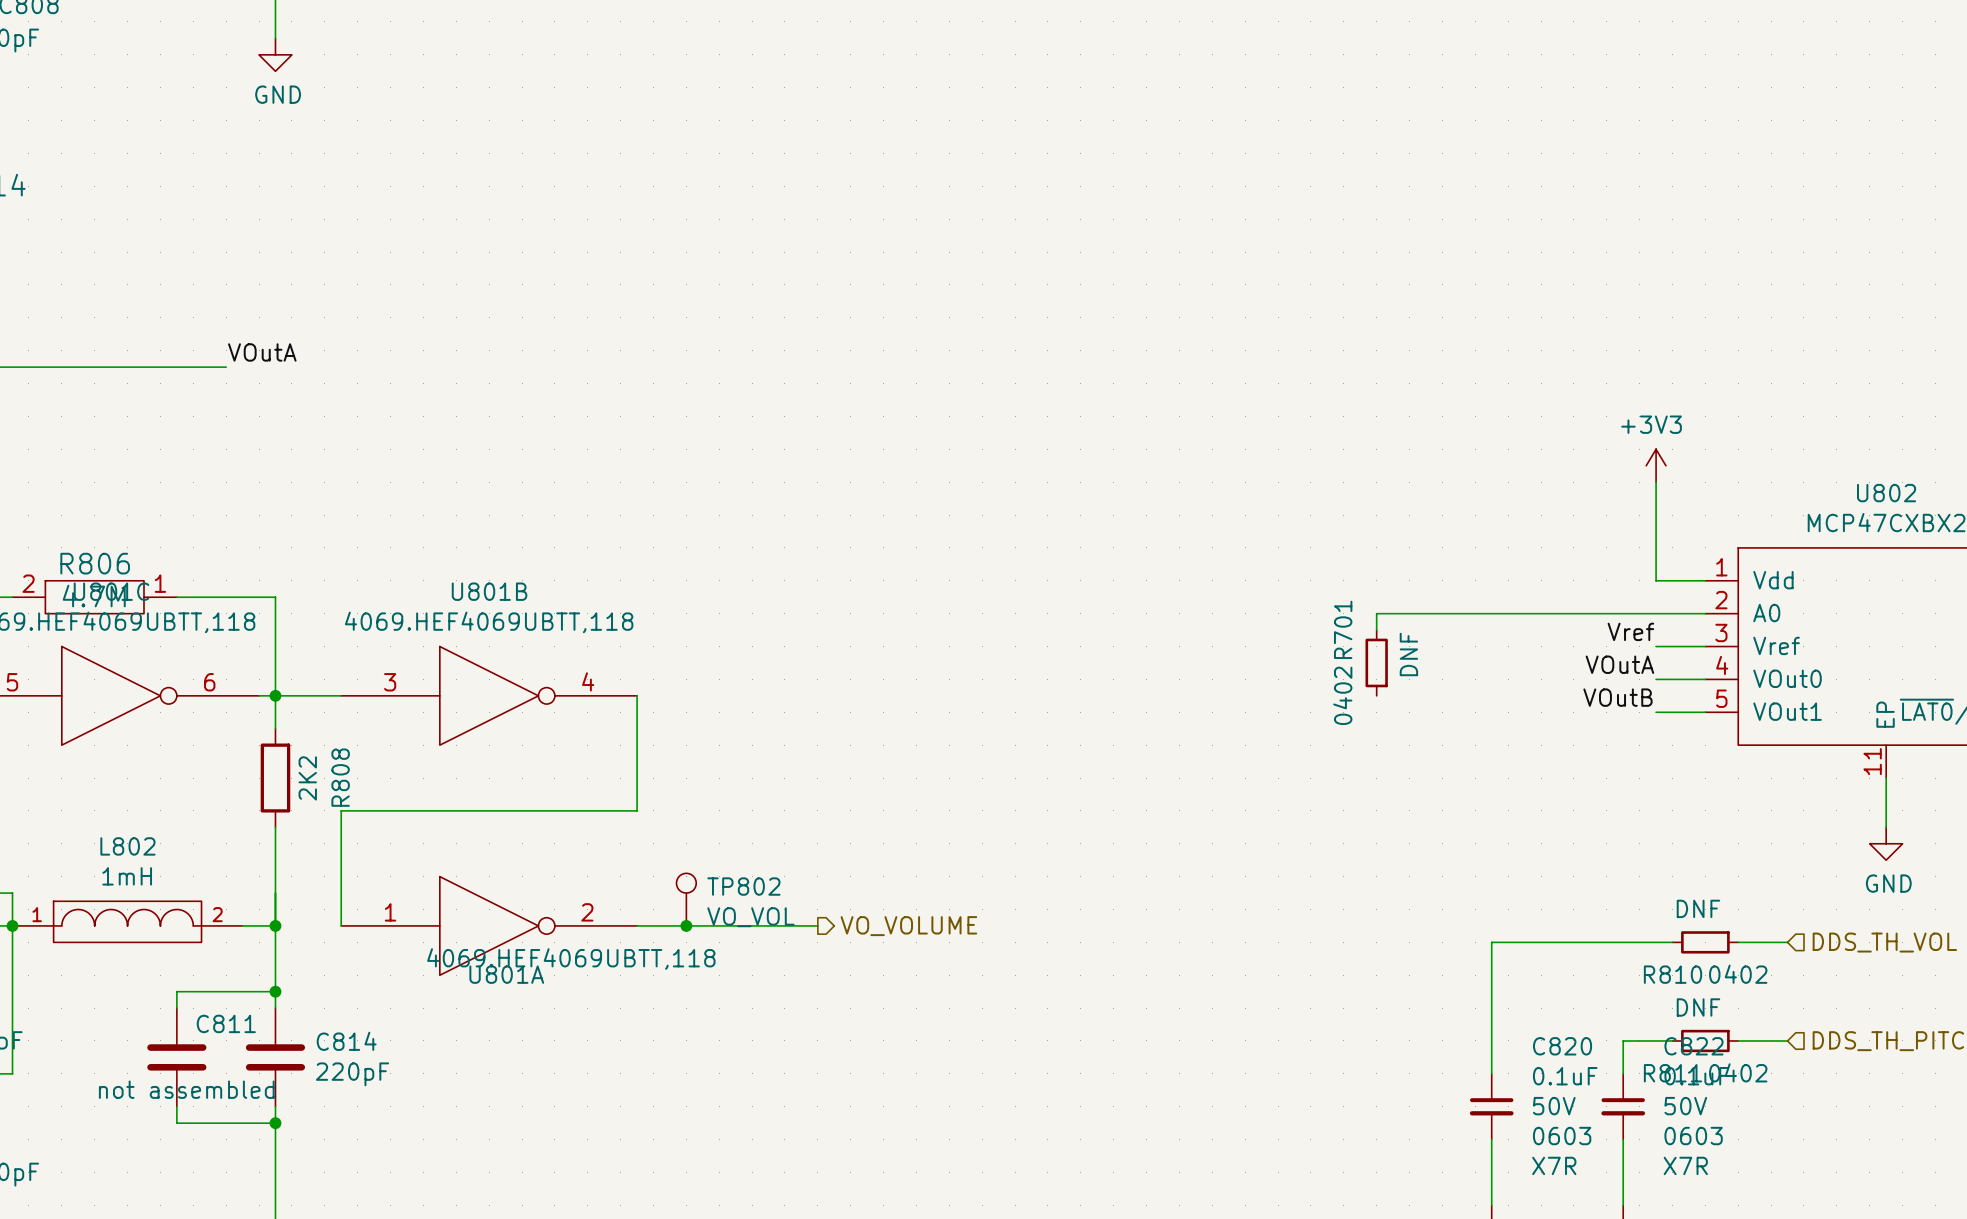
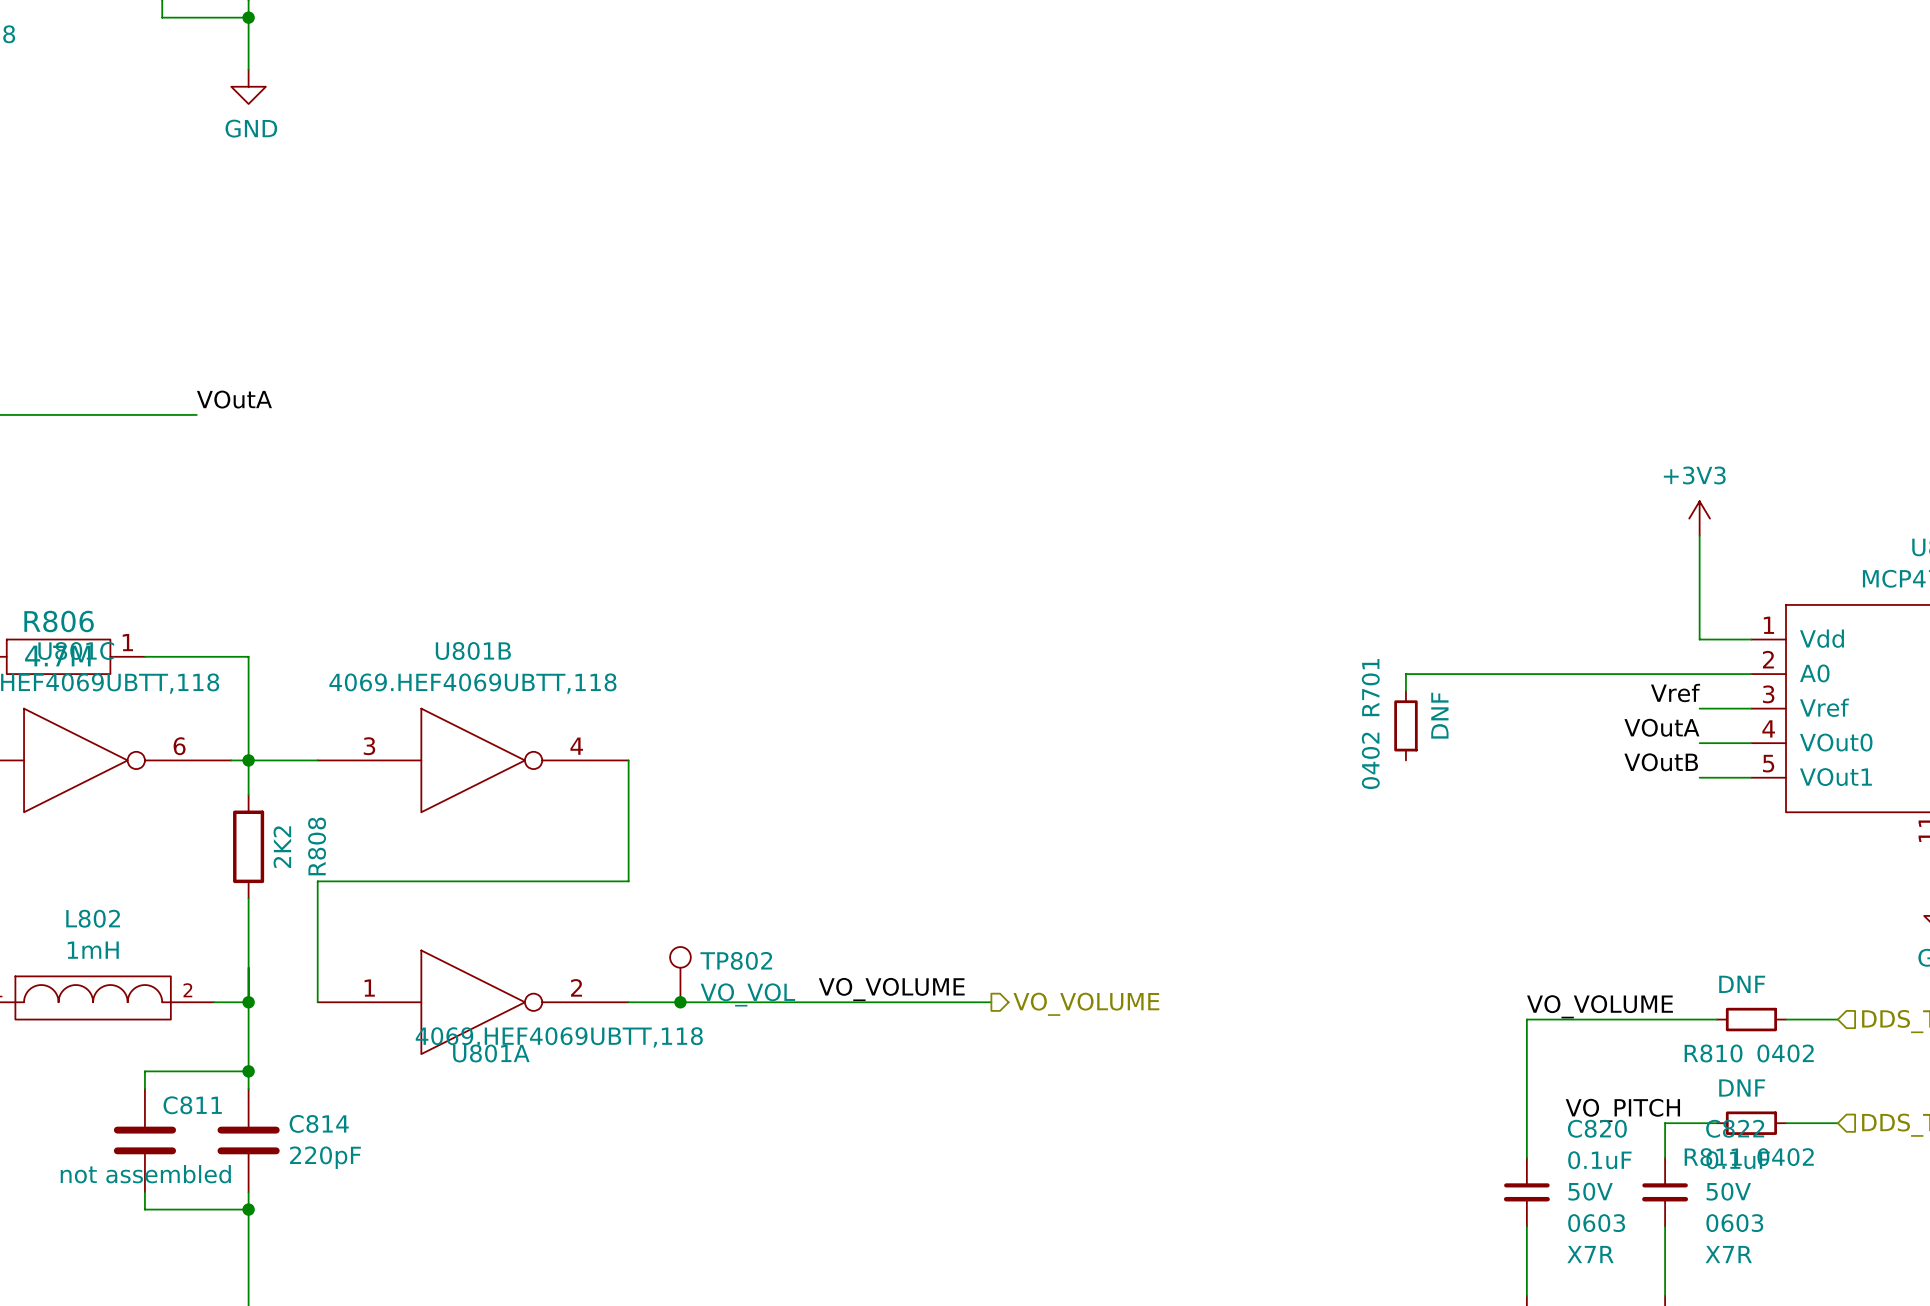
label: none -> VO_VOLUME (891, 989)
wire: none -> (818, 1002) (991, 1002)
hierarchical label position: VO_VOLUME (908, 926) -> VO_VOLUME (1086, 1004)
label: none -> VO_VOLUME (1599, 1006)
label: none -> VO_PITCH (1622, 1110)

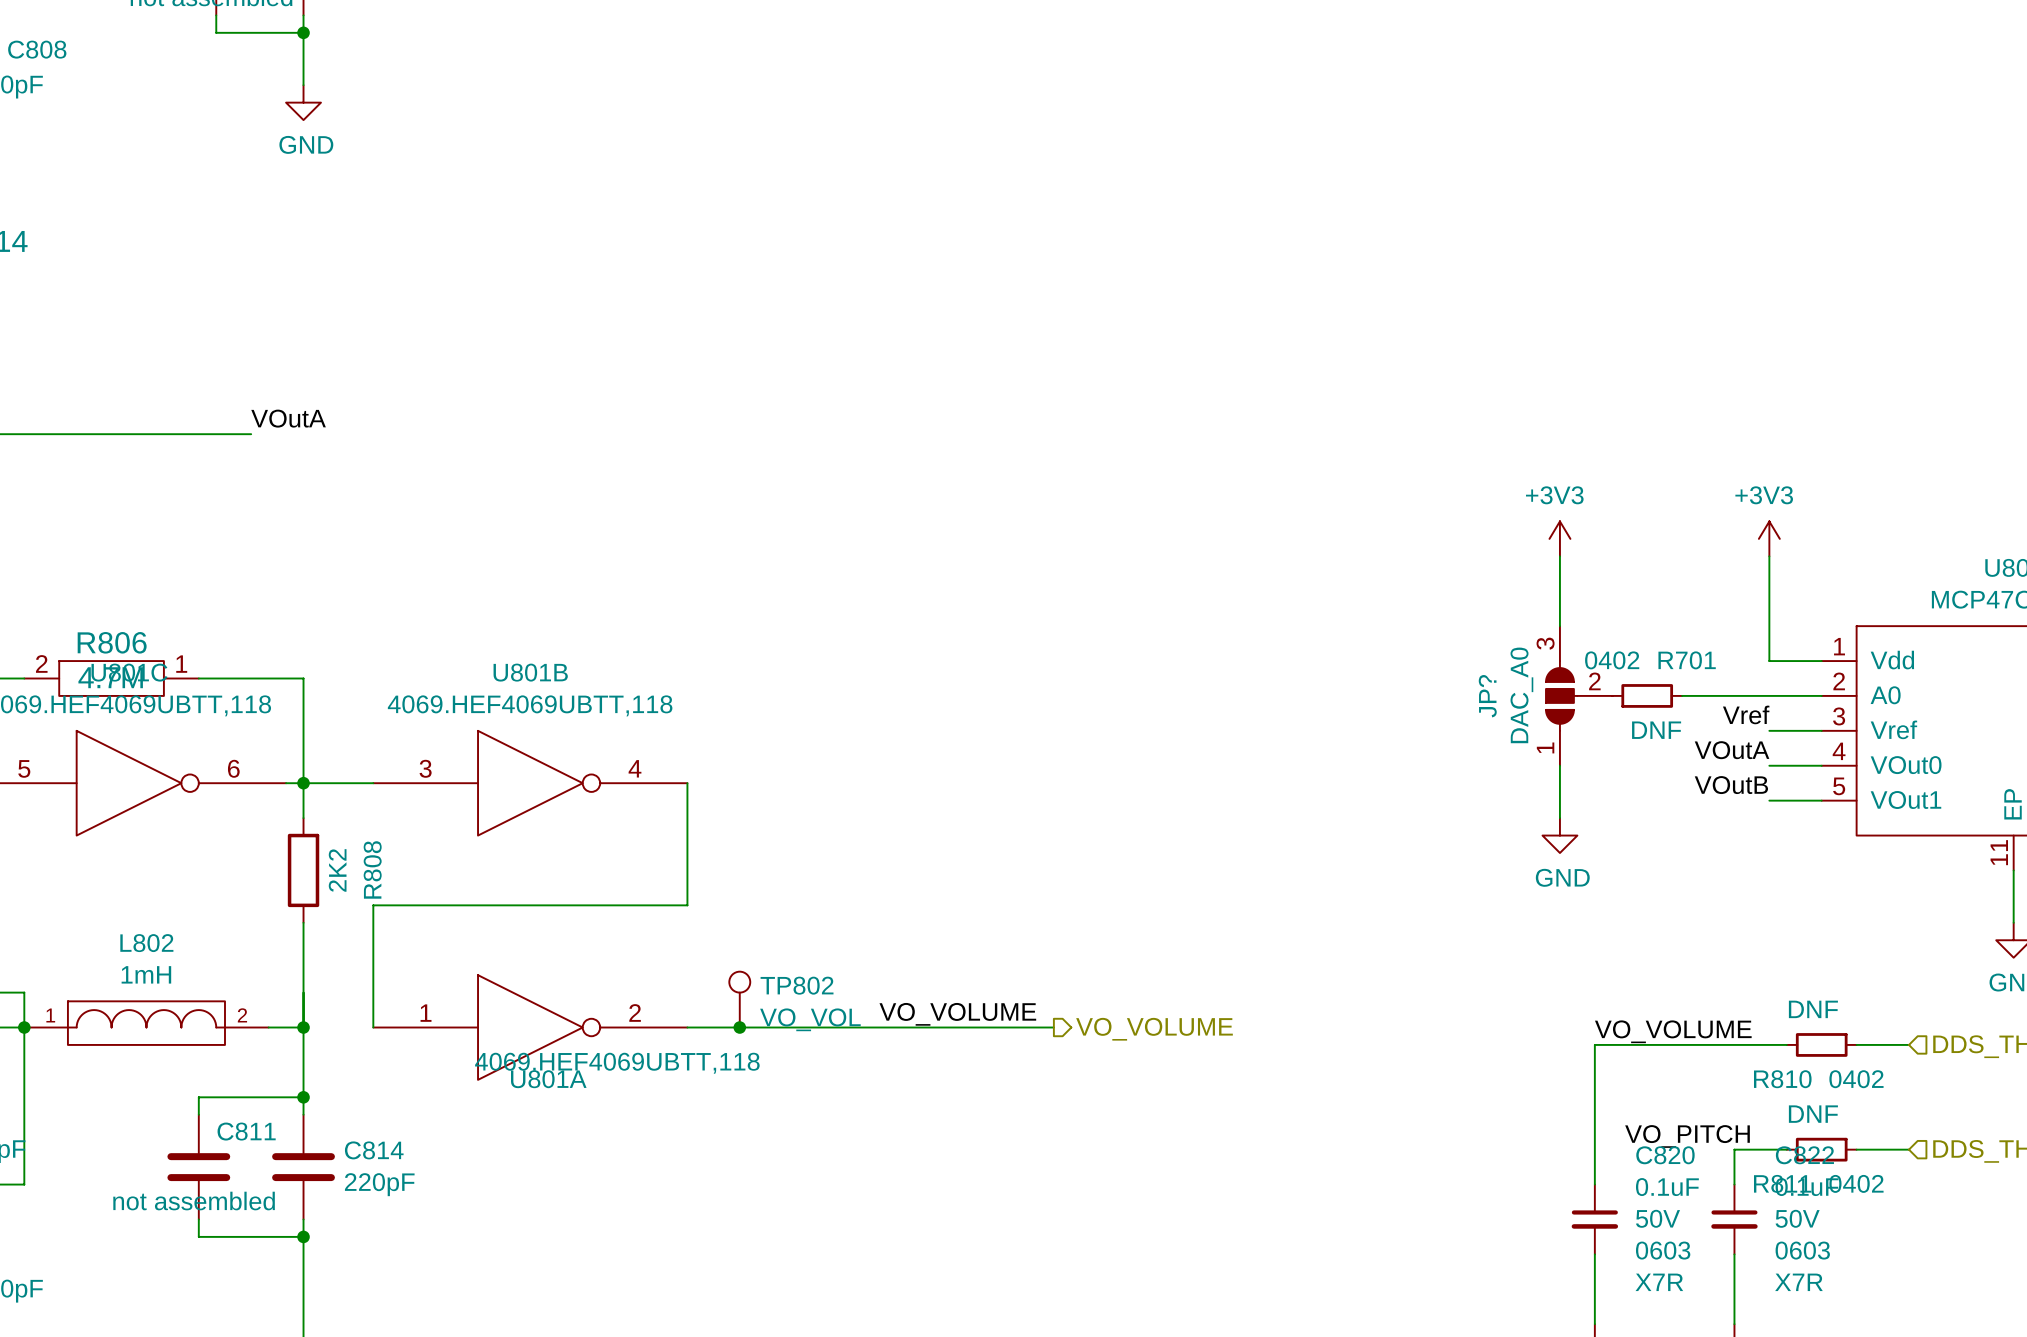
power symbol: none -> +3V3 (1559, 538)
wire: none -> (1559, 556) (1559, 626)
JP?: none -> DAC_A0 (1579, 695)
wire: (1613, 674) (1405, 674) (1405, 691) -> none
R701 rotation: 0° (1405, 725) -> 90° clockwise (1647, 695)
R701 position: (1405, 725) -> (1647, 695)
wire: none -> (1559, 765) (1559, 818)
power symbol: none -> GND (1559, 835)

